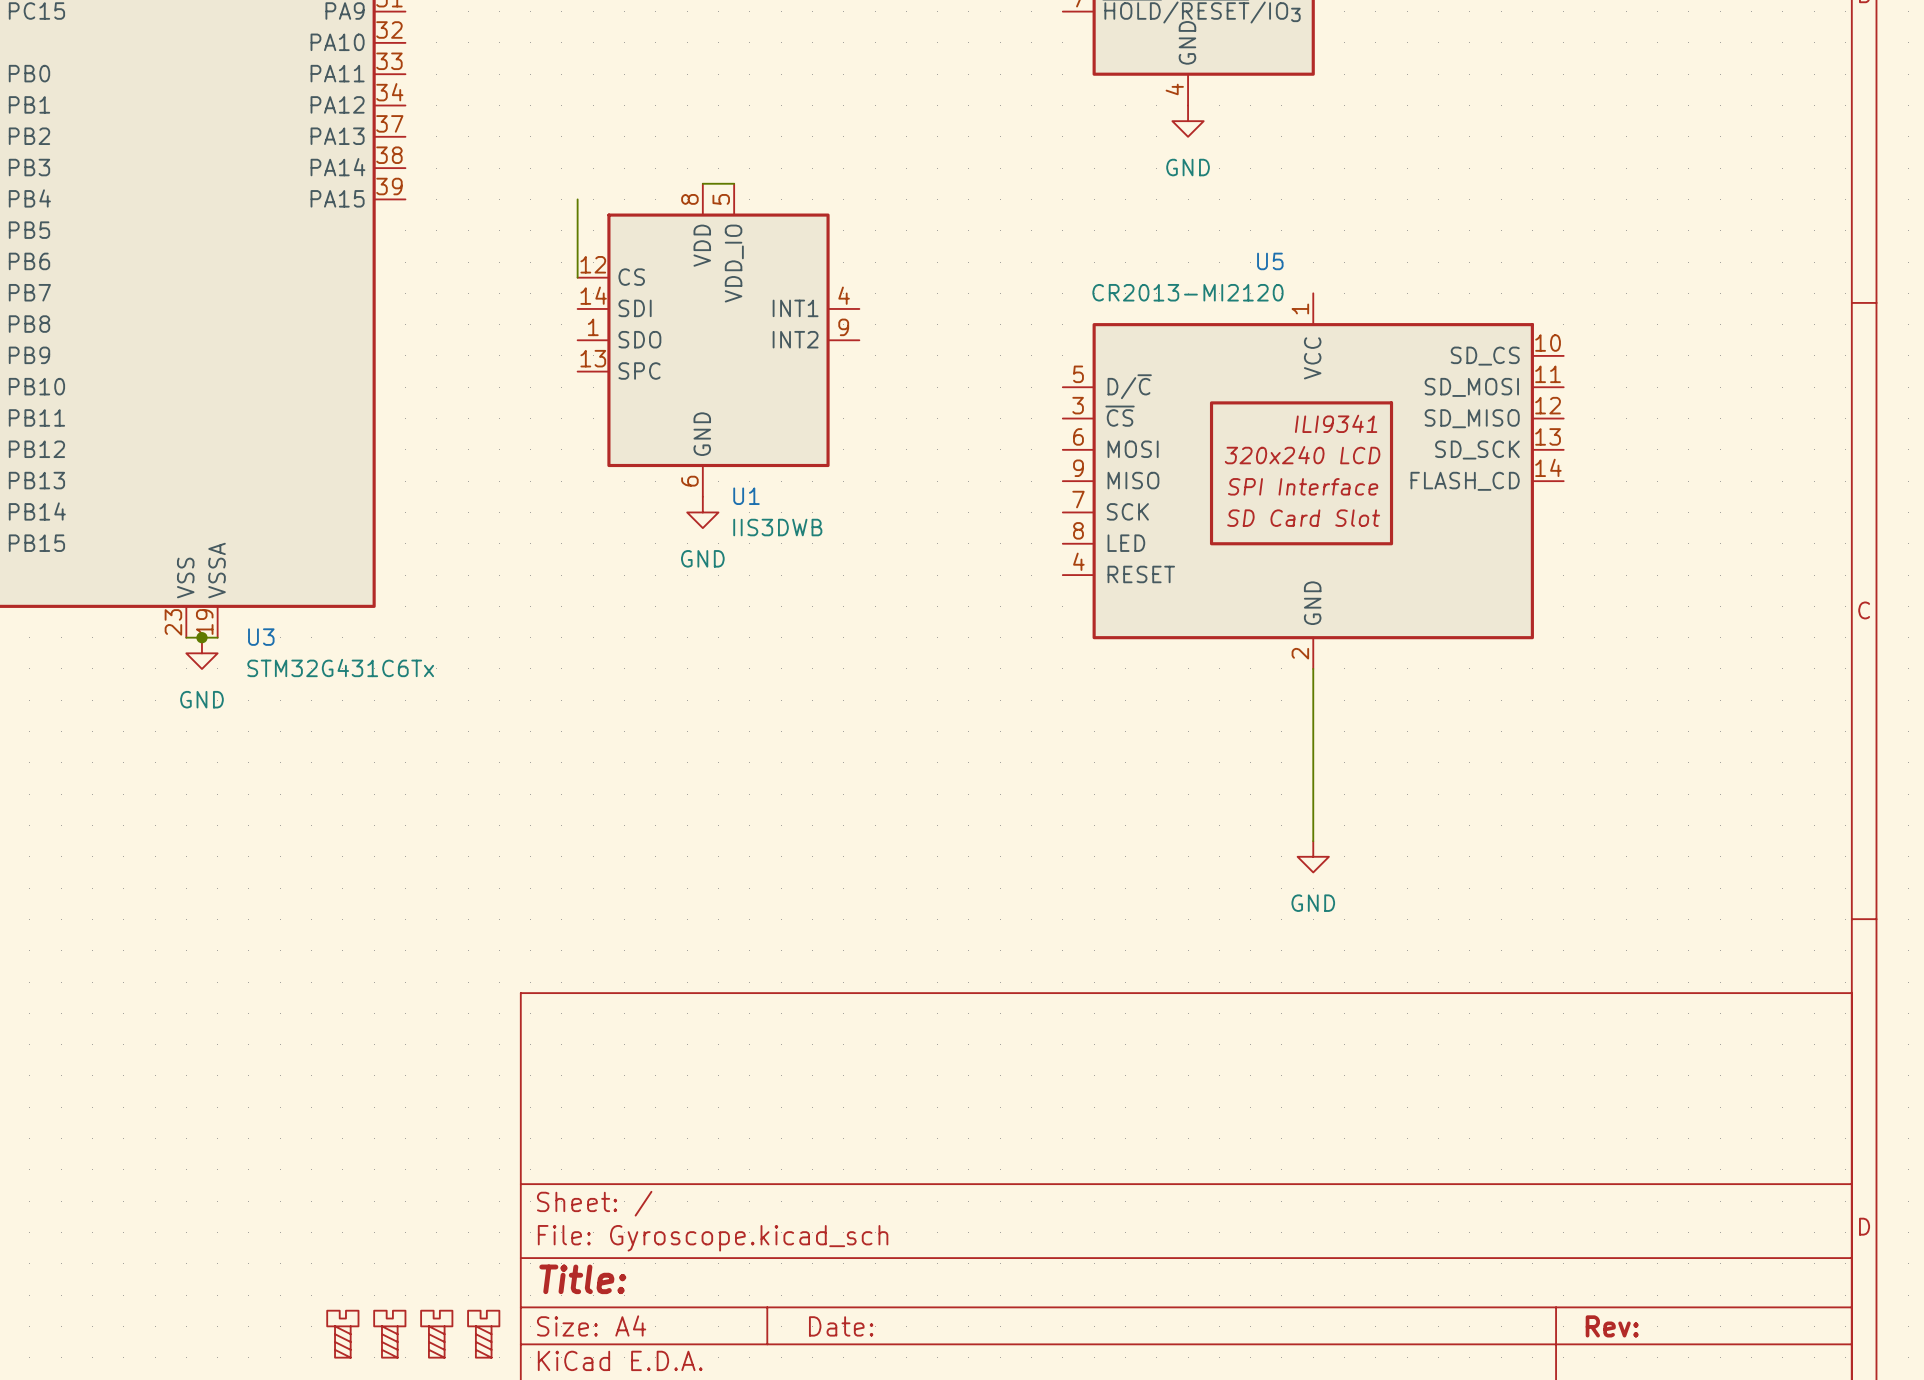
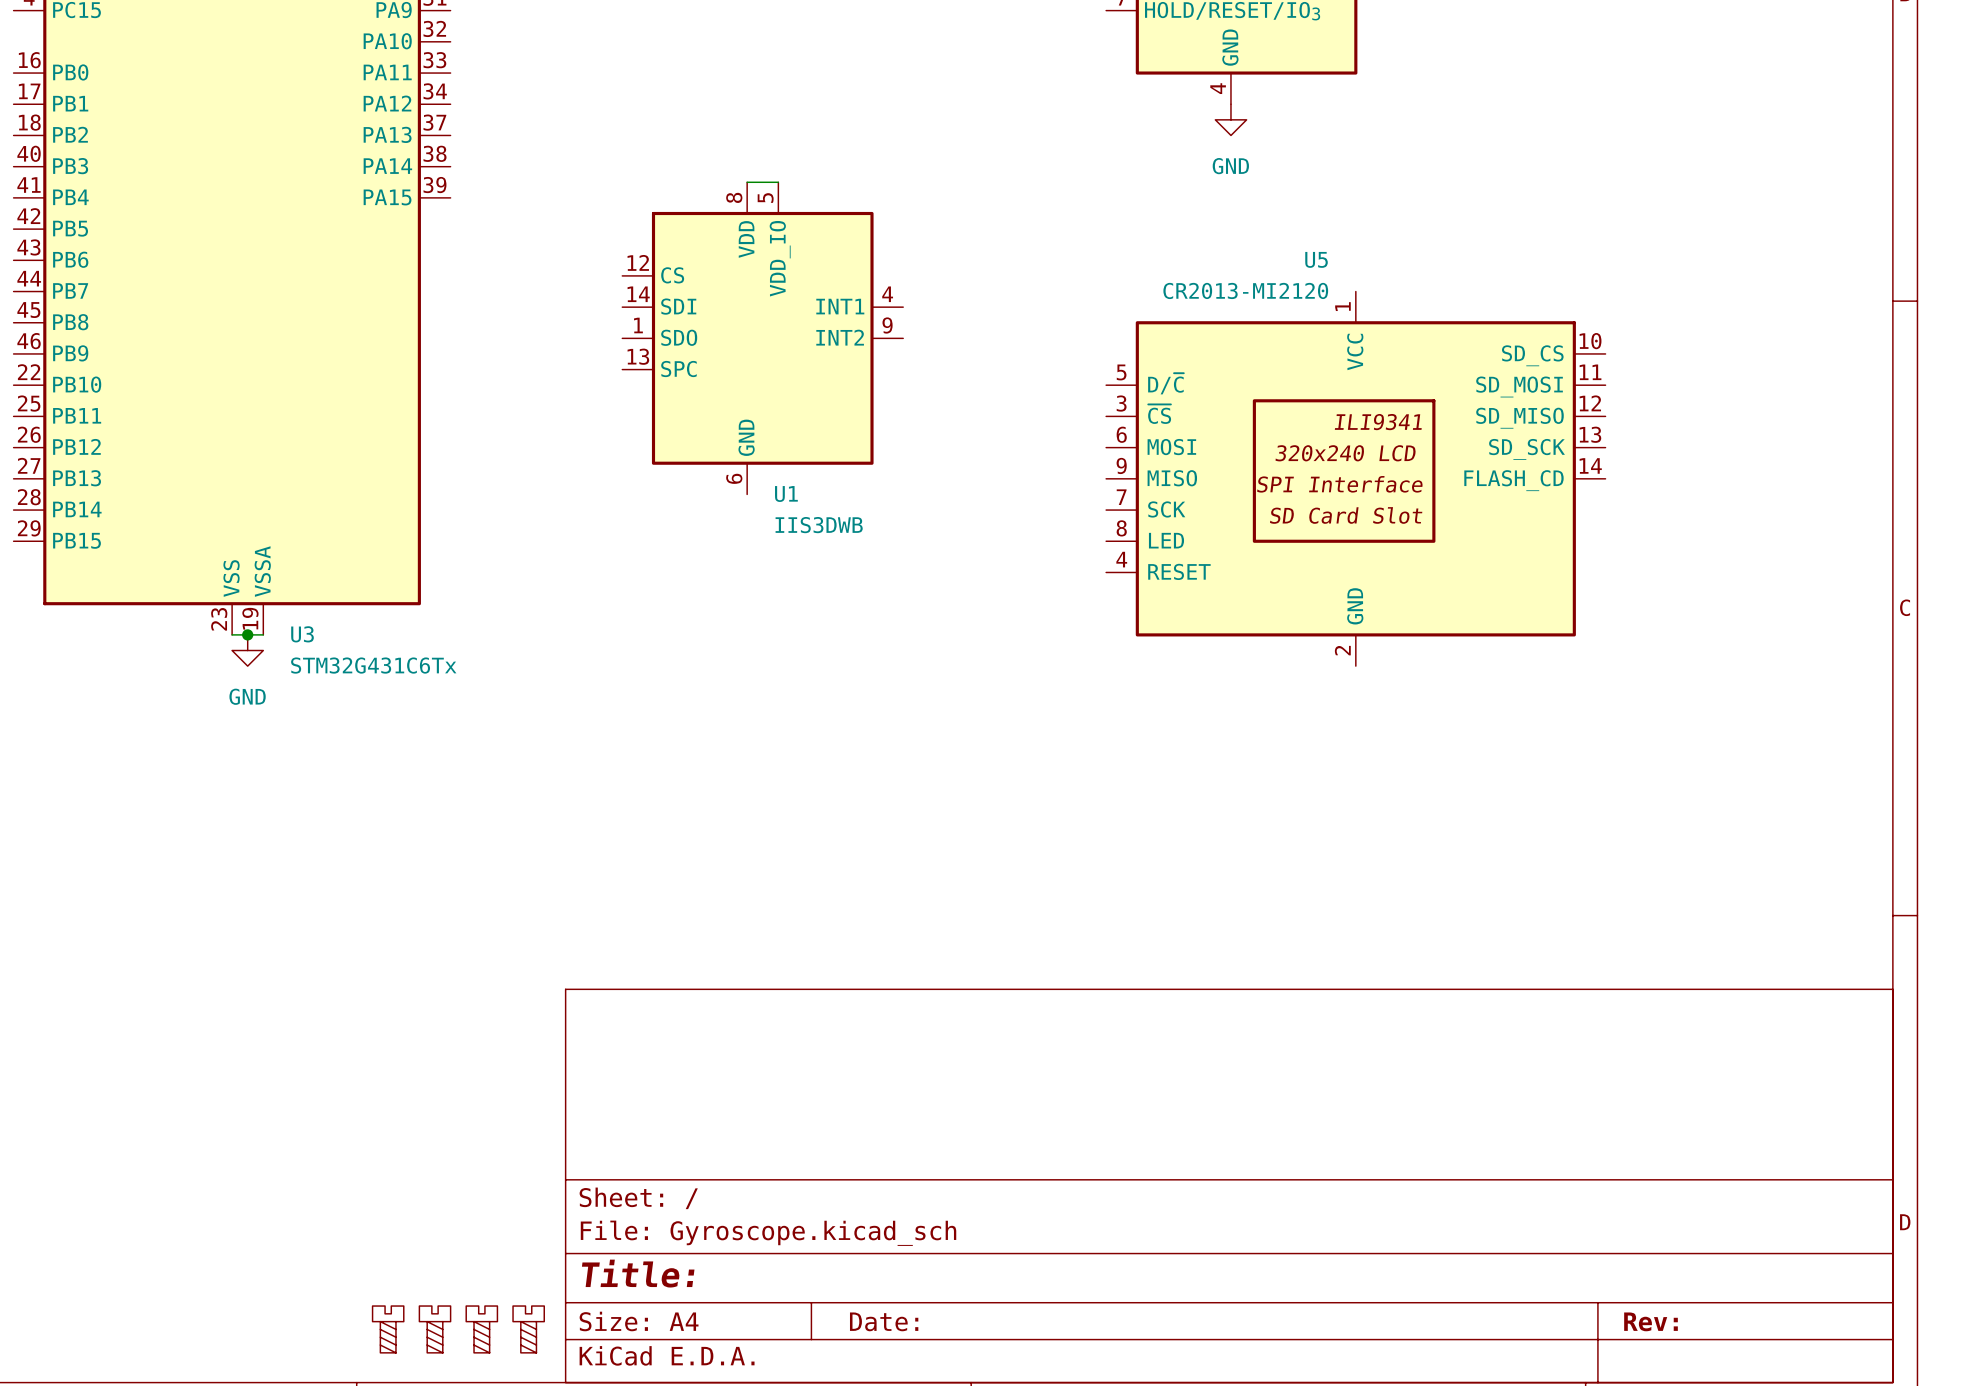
wire: (577, 199) (577, 277) -> none
power symbol: GND (702, 512) -> none
wire: (1313, 668) (1313, 841) -> none
power symbol: GND (1313, 856) -> none

